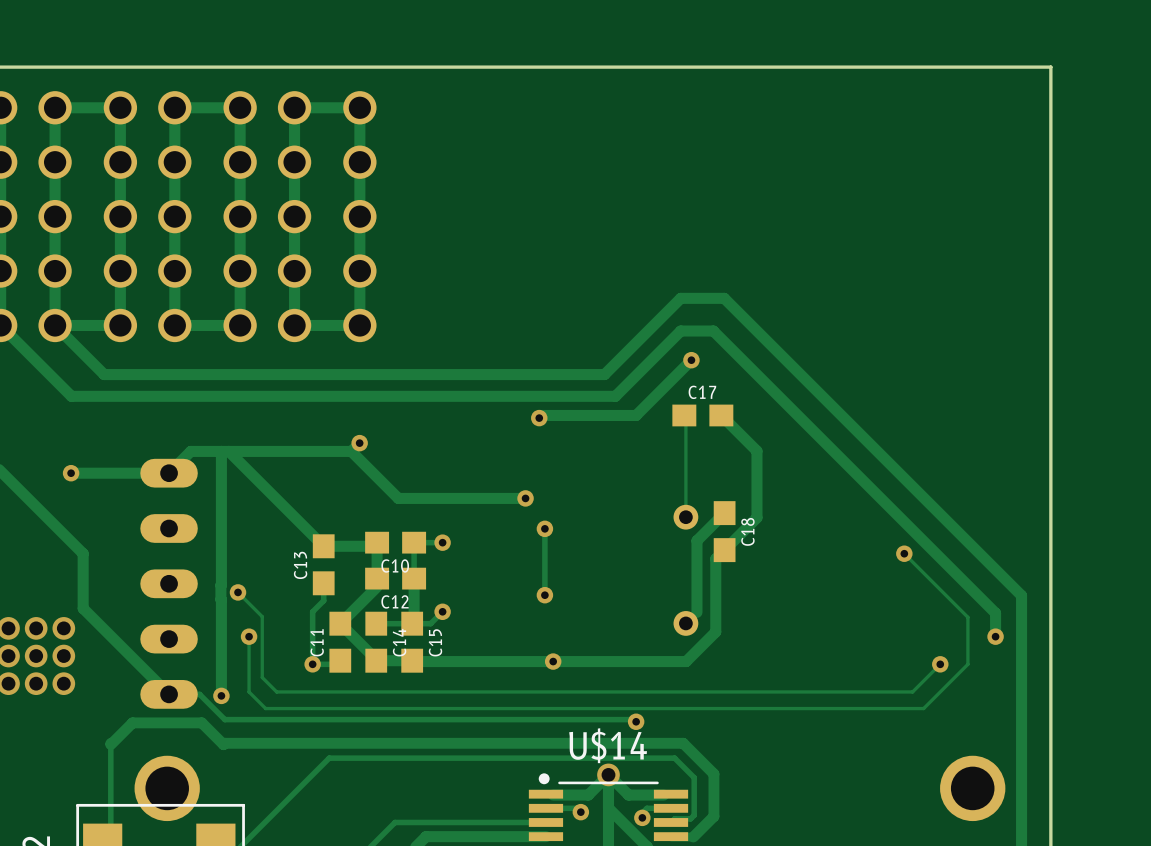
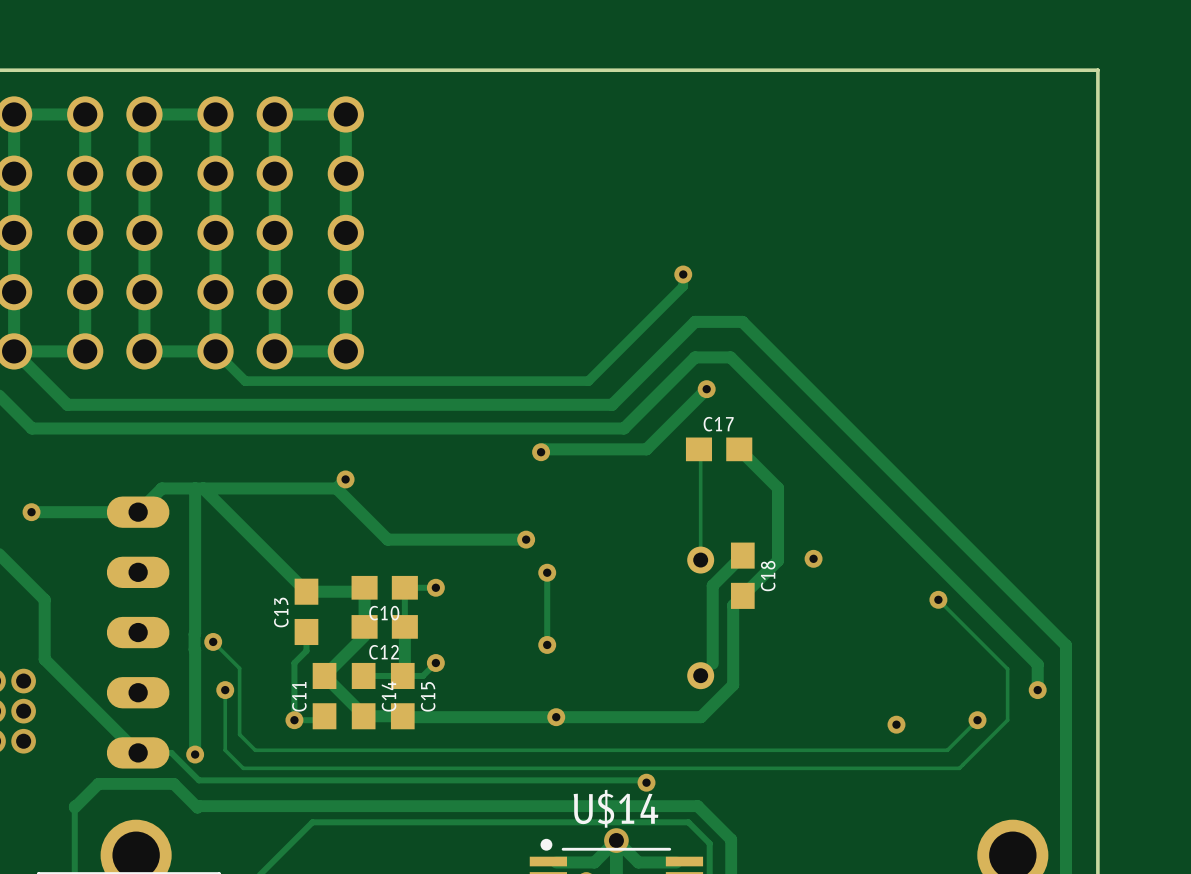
track: none -> (683, 274) (683, 286) (588, 381) (245, 381) (215, 351)
via: none -> (683, 274)
via: none -> (813, 558)
via: none -> (896, 724)

